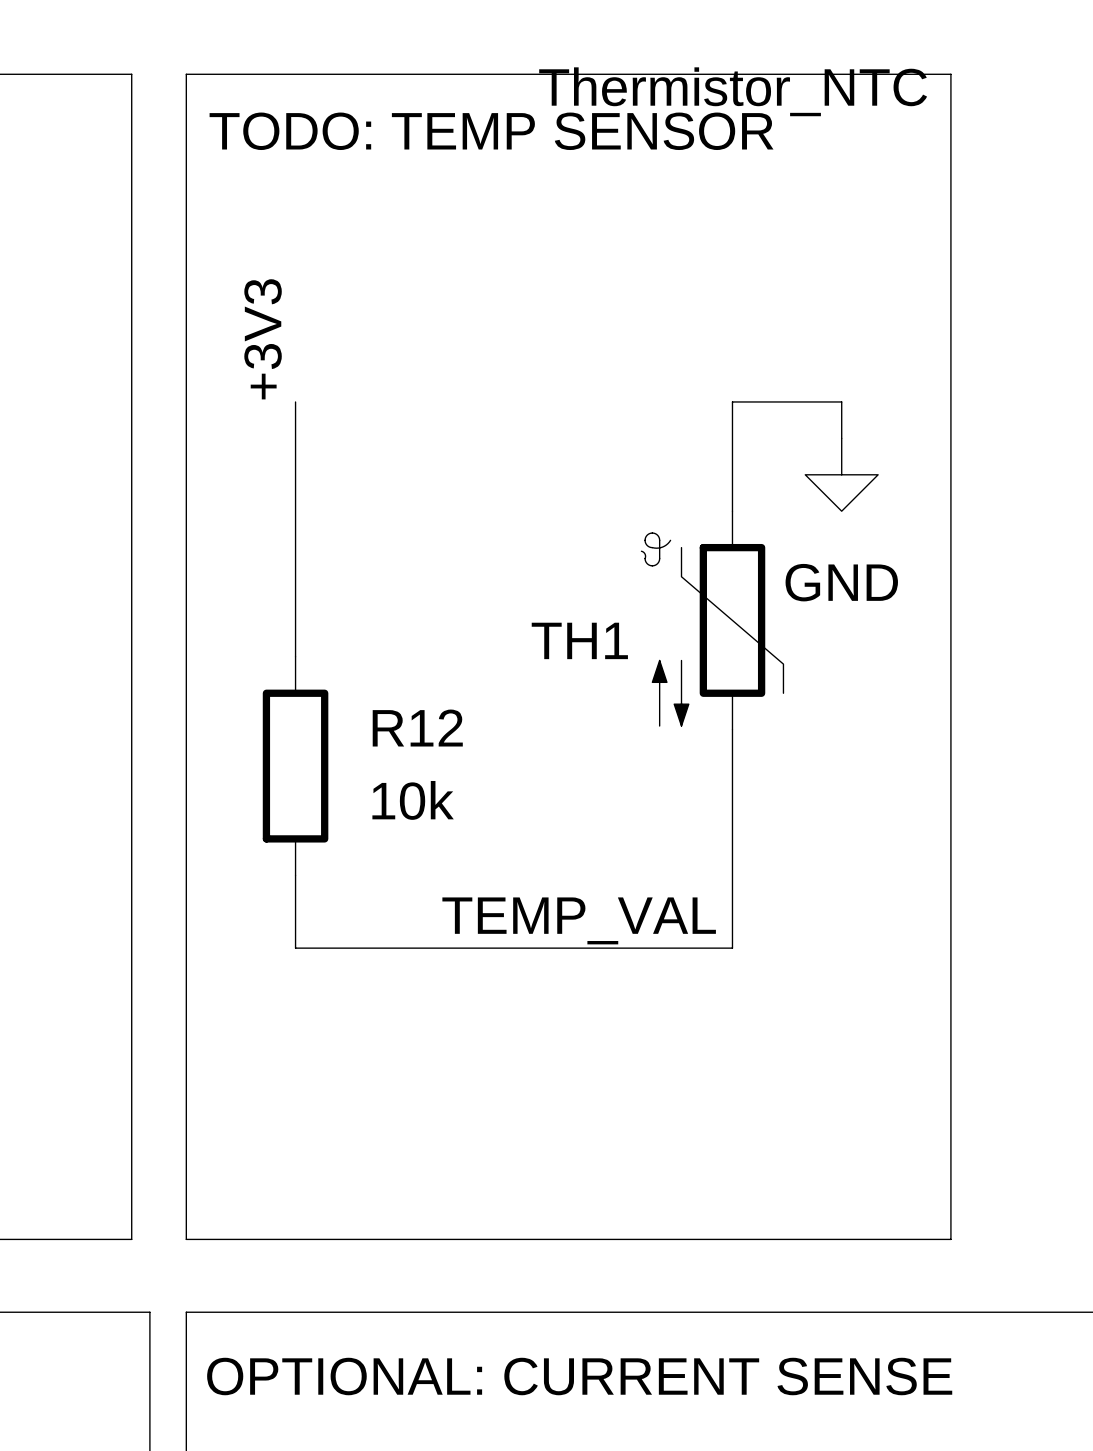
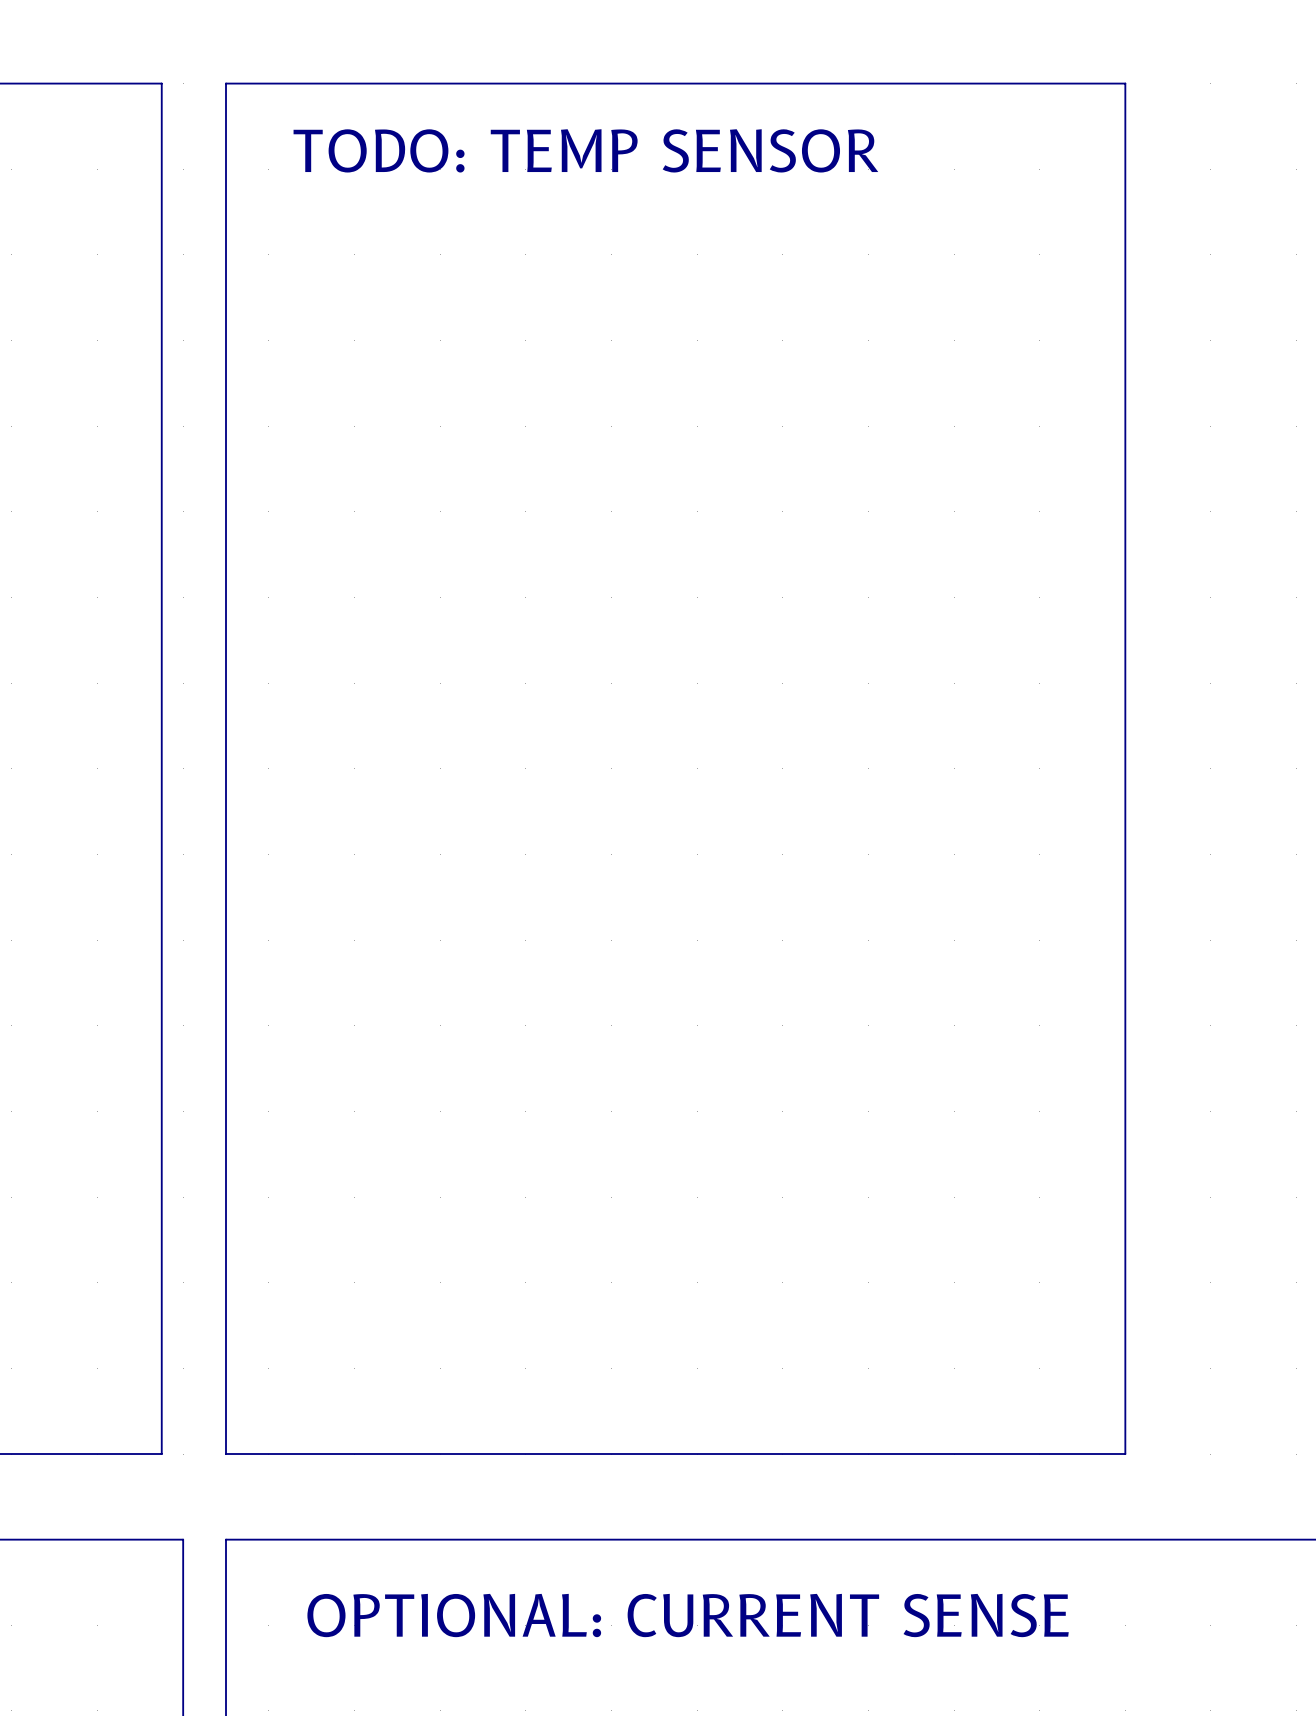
label: +3V3 (263, 339) -> none
wire: (295, 401) (295, 656) -> none
wire: (841, 438) (841, 401) (732, 401) (732, 511) -> none
power symbol: GND (841, 474) -> none
TH1: Thermistor_NTC (712, 620) -> none
wire: (732, 729) (732, 948) (295, 948) (295, 875) -> none
R12: 10k (295, 766) -> none
label: TEMP_VAL (579, 920) -> none

